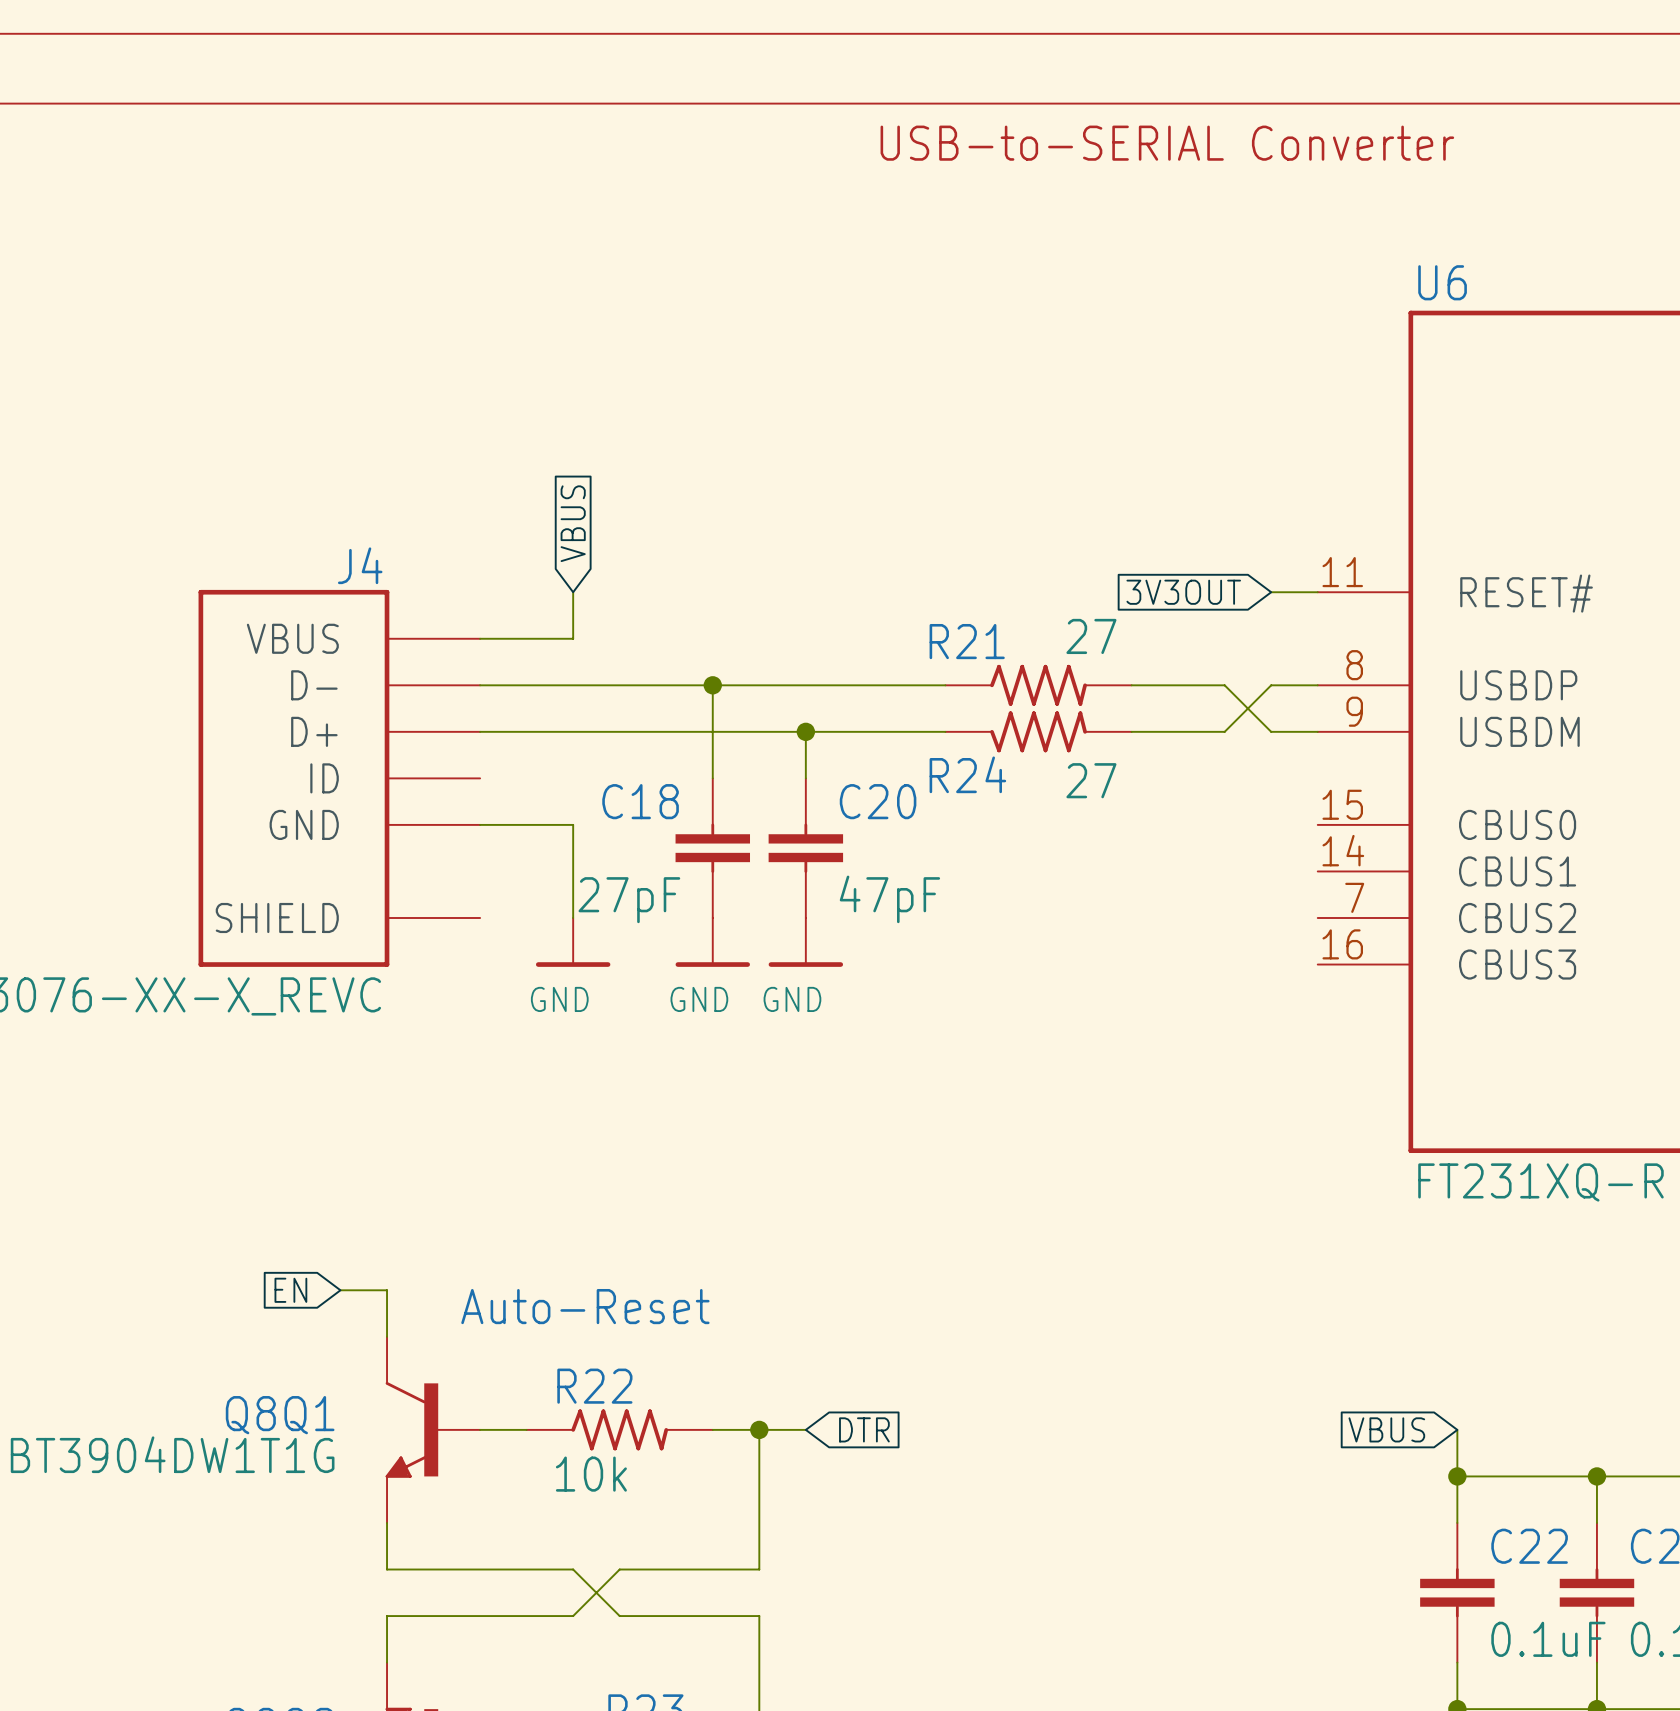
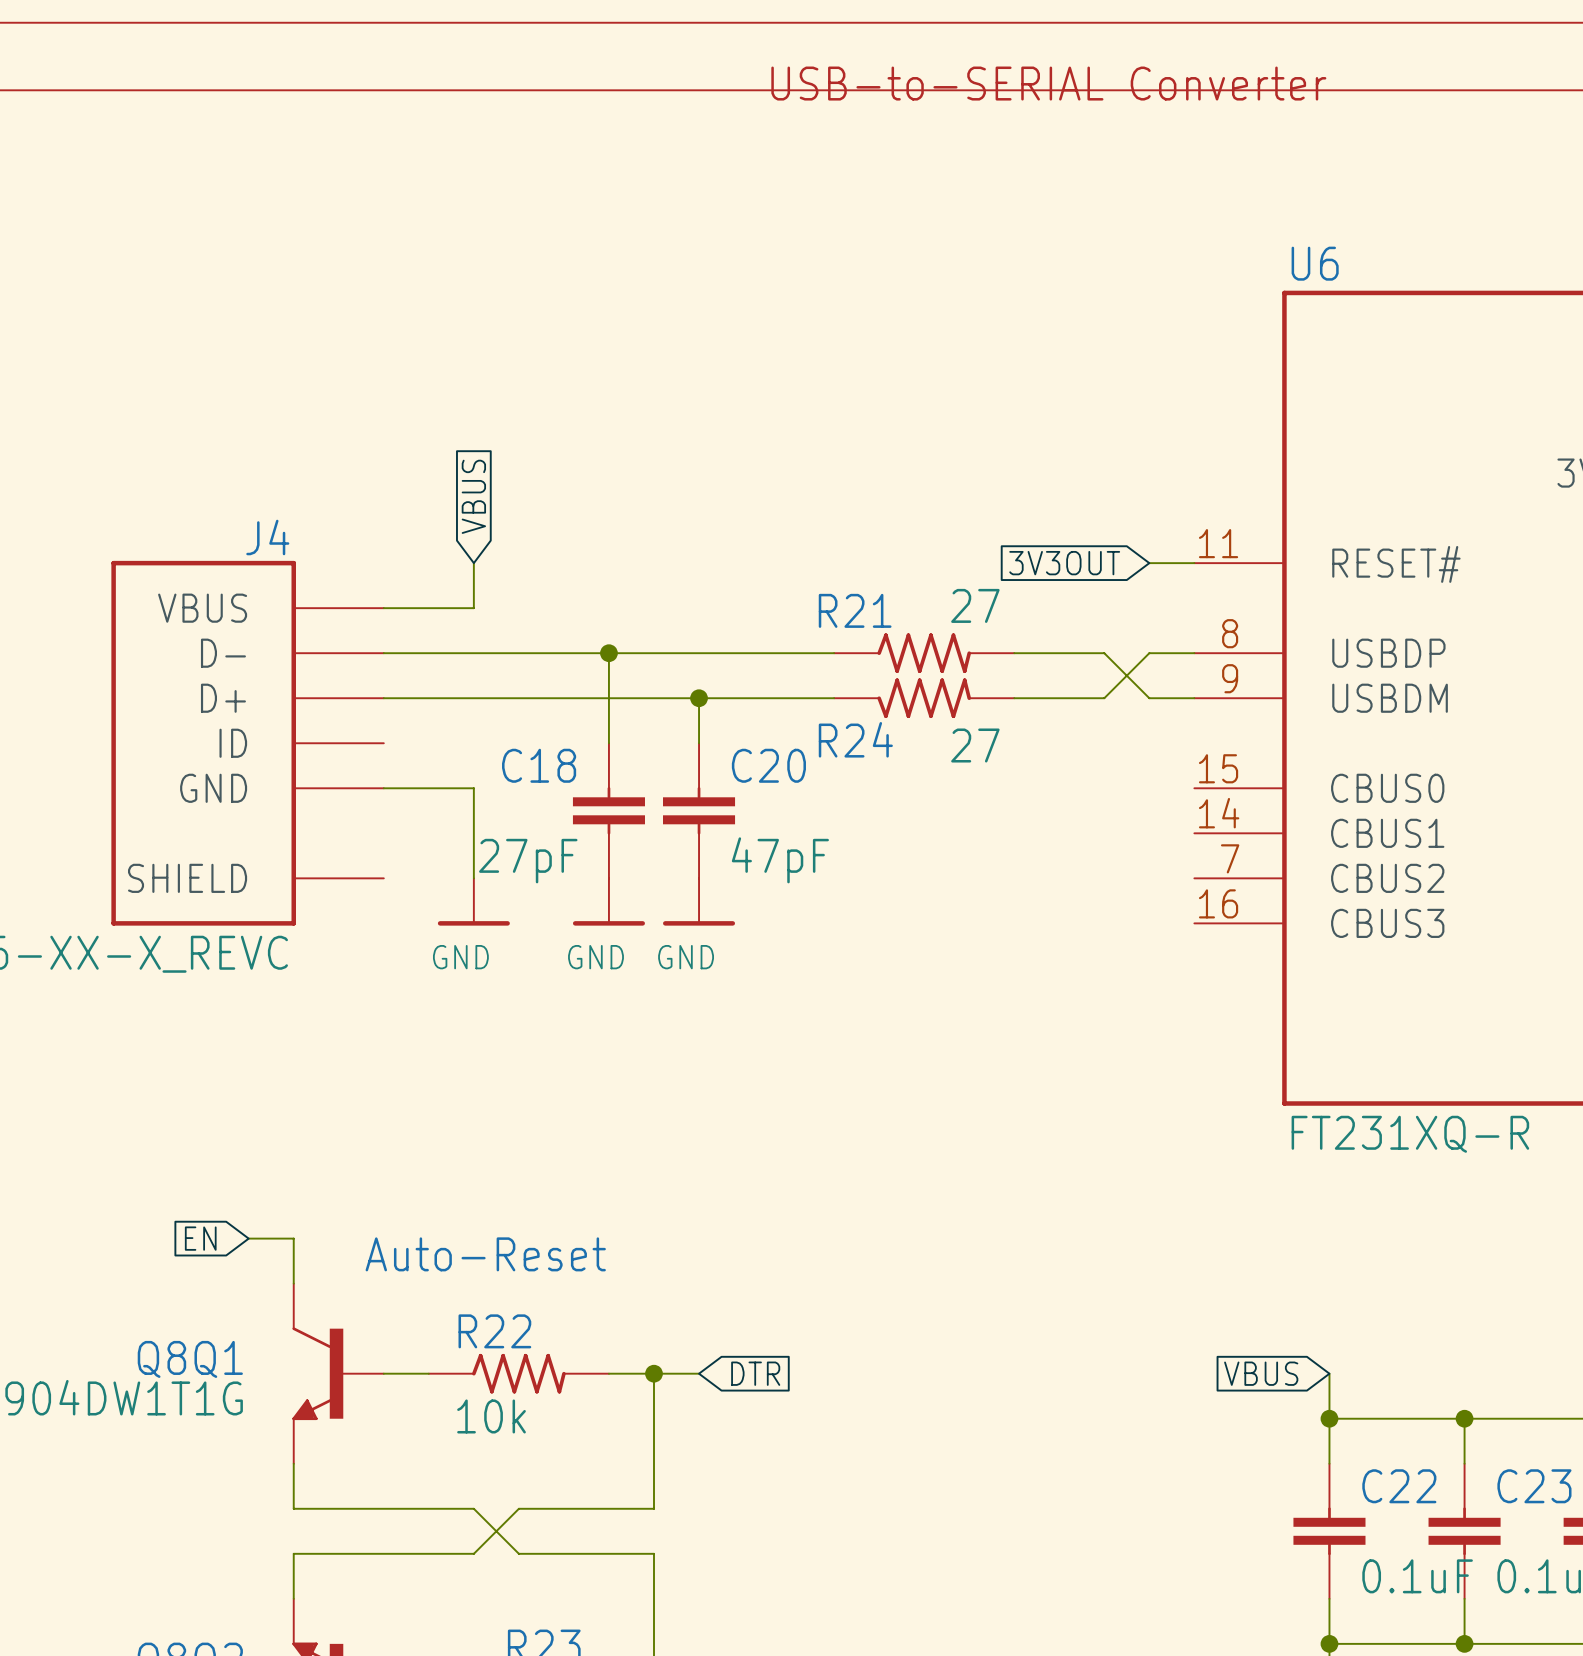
text position: USB-to-SERIAL Converter (1167, 143) -> USB-to-SERIAL Converter (1048, 83)

